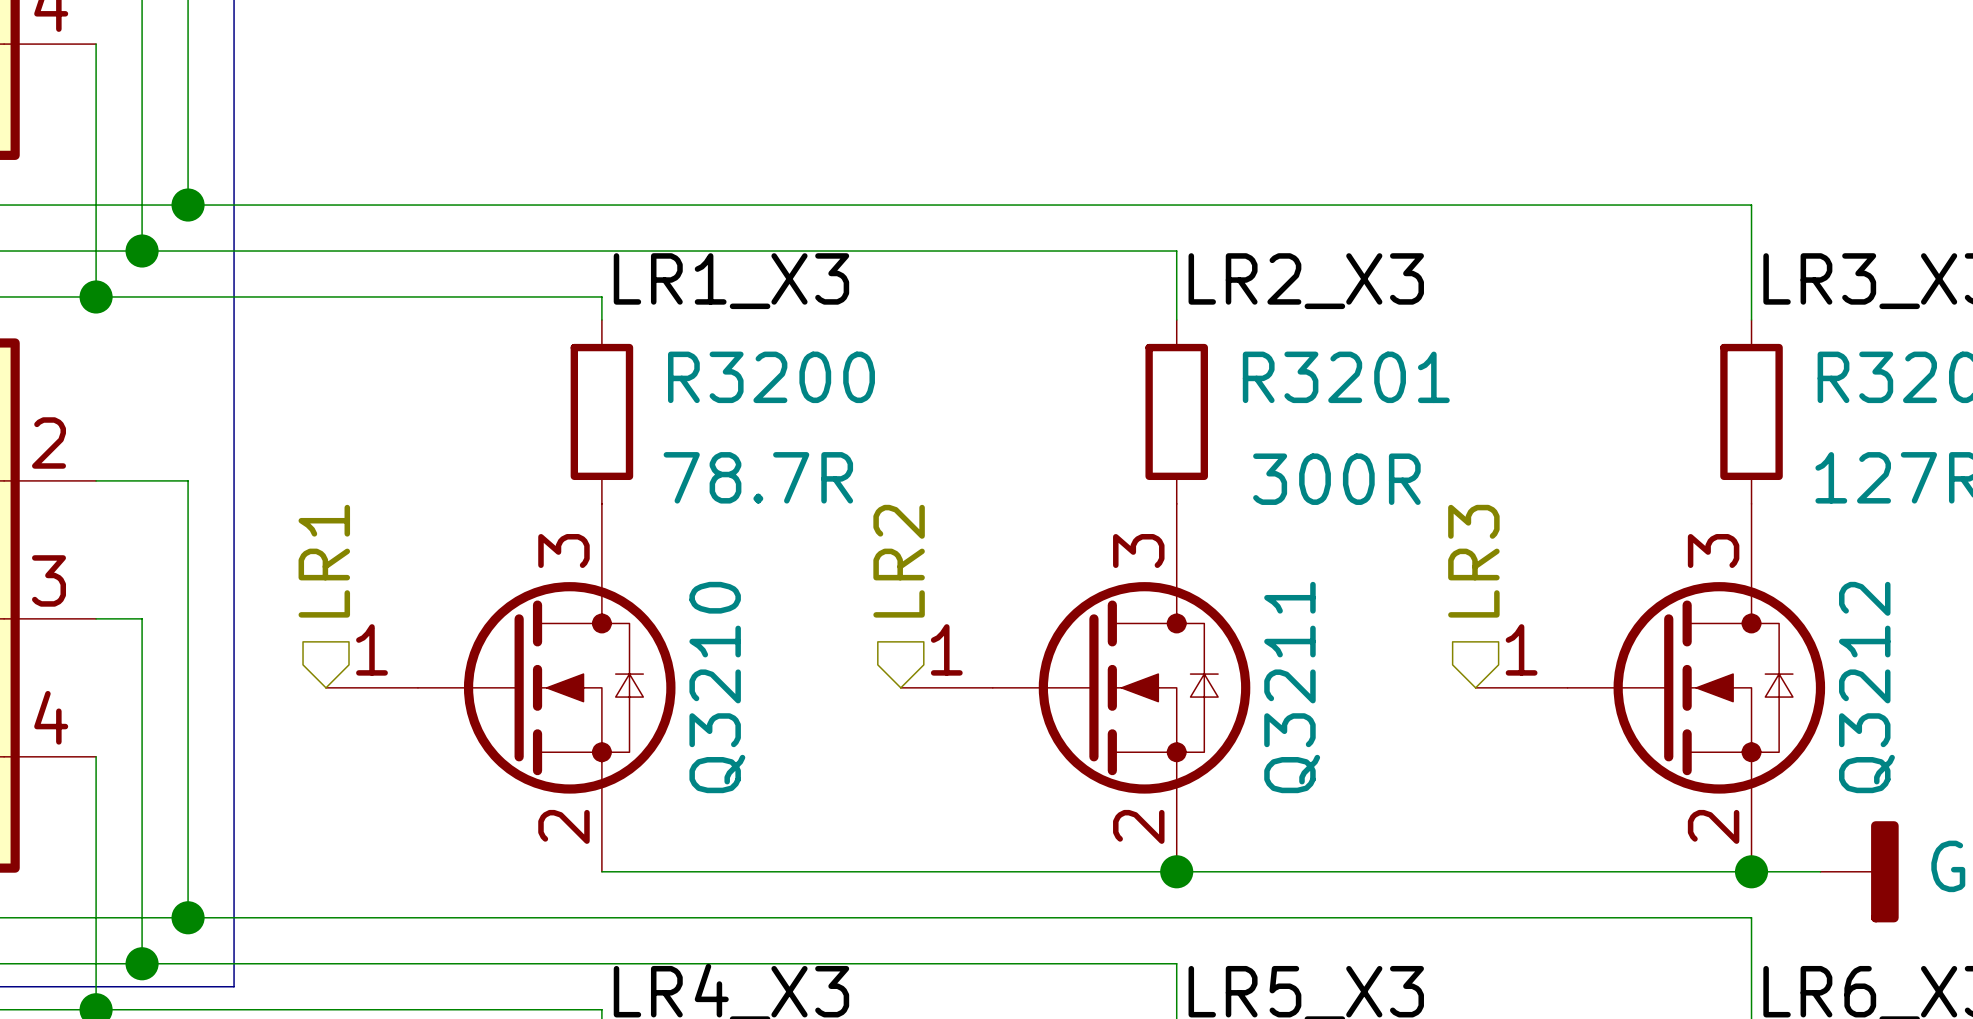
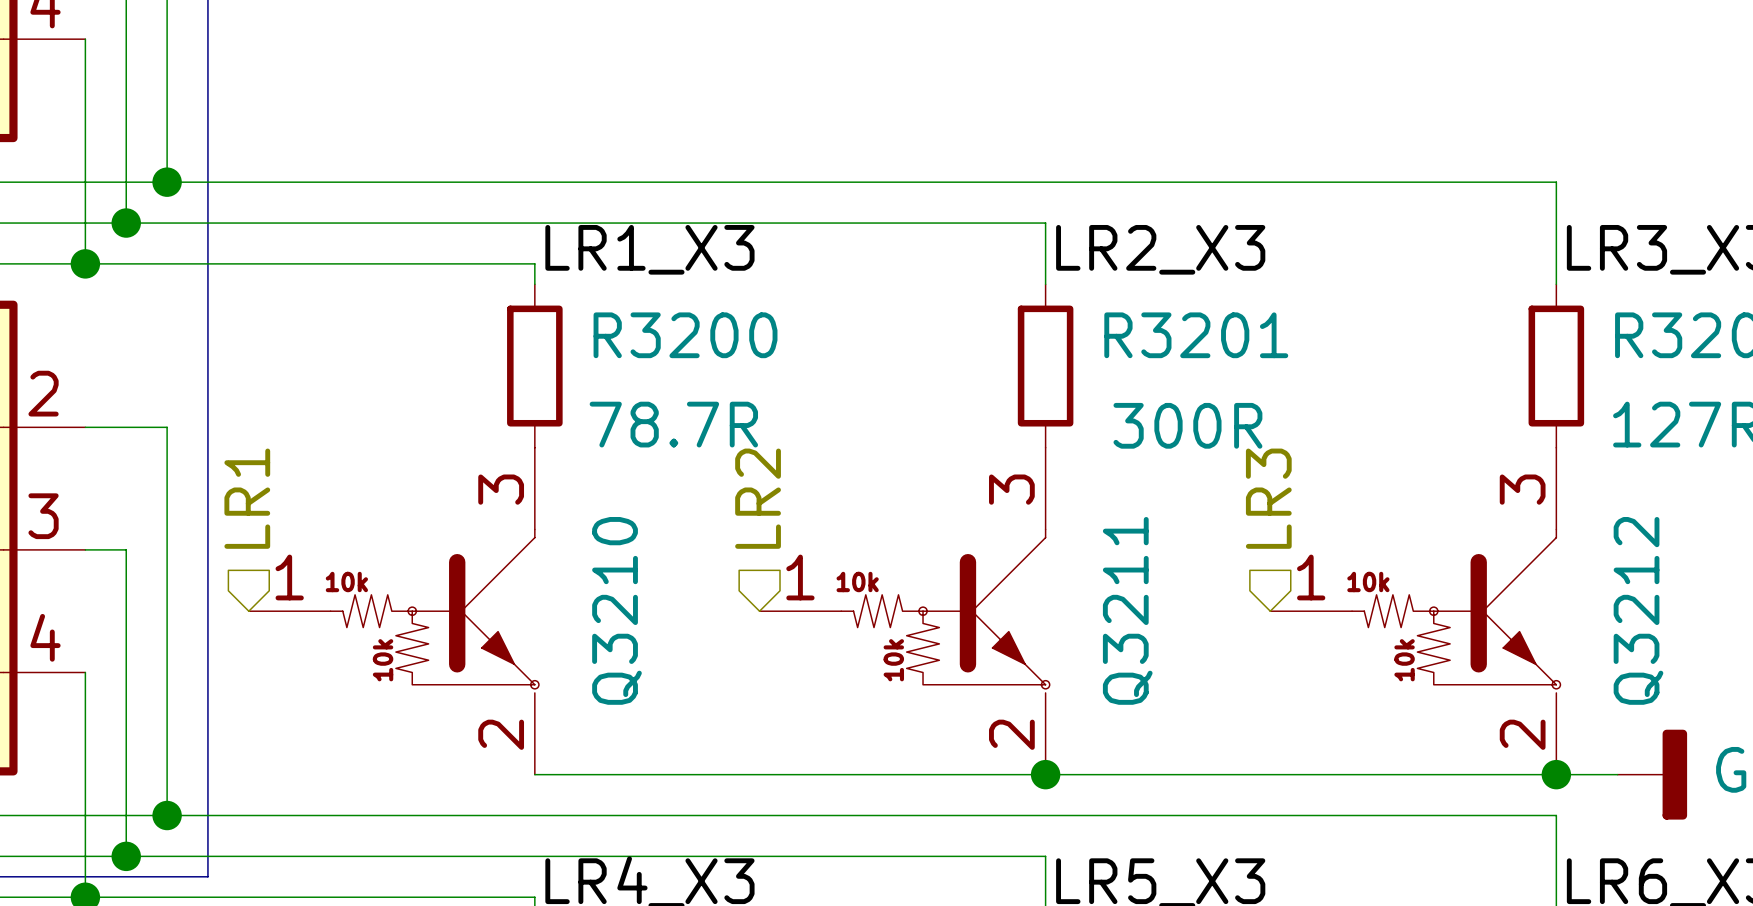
Q3210 symbol: [326, 503, 676, 872] -> [248, 447, 539, 775]
Q3211 symbol: [900, 503, 1251, 872] -> [759, 447, 1050, 775]
Q3212 symbol: [1475, 503, 1826, 872] -> [1270, 447, 1561, 775]
hierarchical label position: LR1 (324, 561) -> LR1 (247, 498)
hierarchical label position: LR2 (899, 561) -> LR2 (758, 498)
hierarchical label position: LR3 (1473, 561) -> LR3 (1268, 498)

